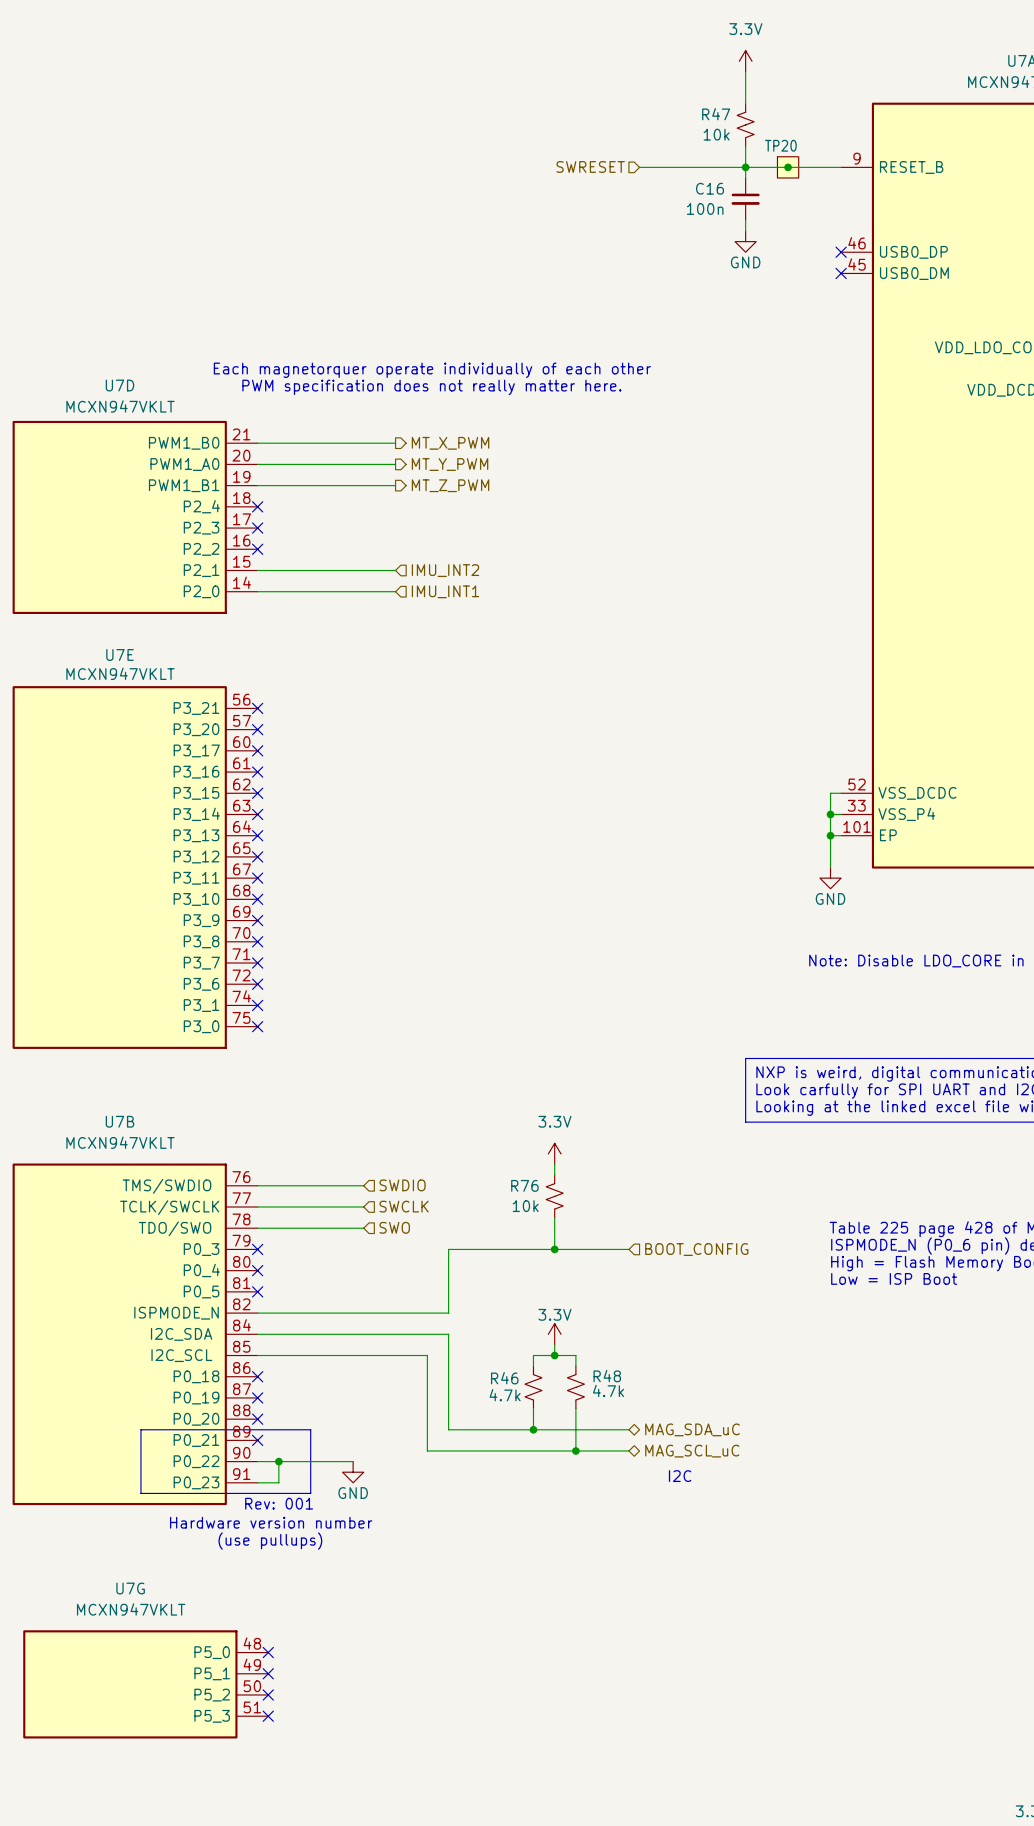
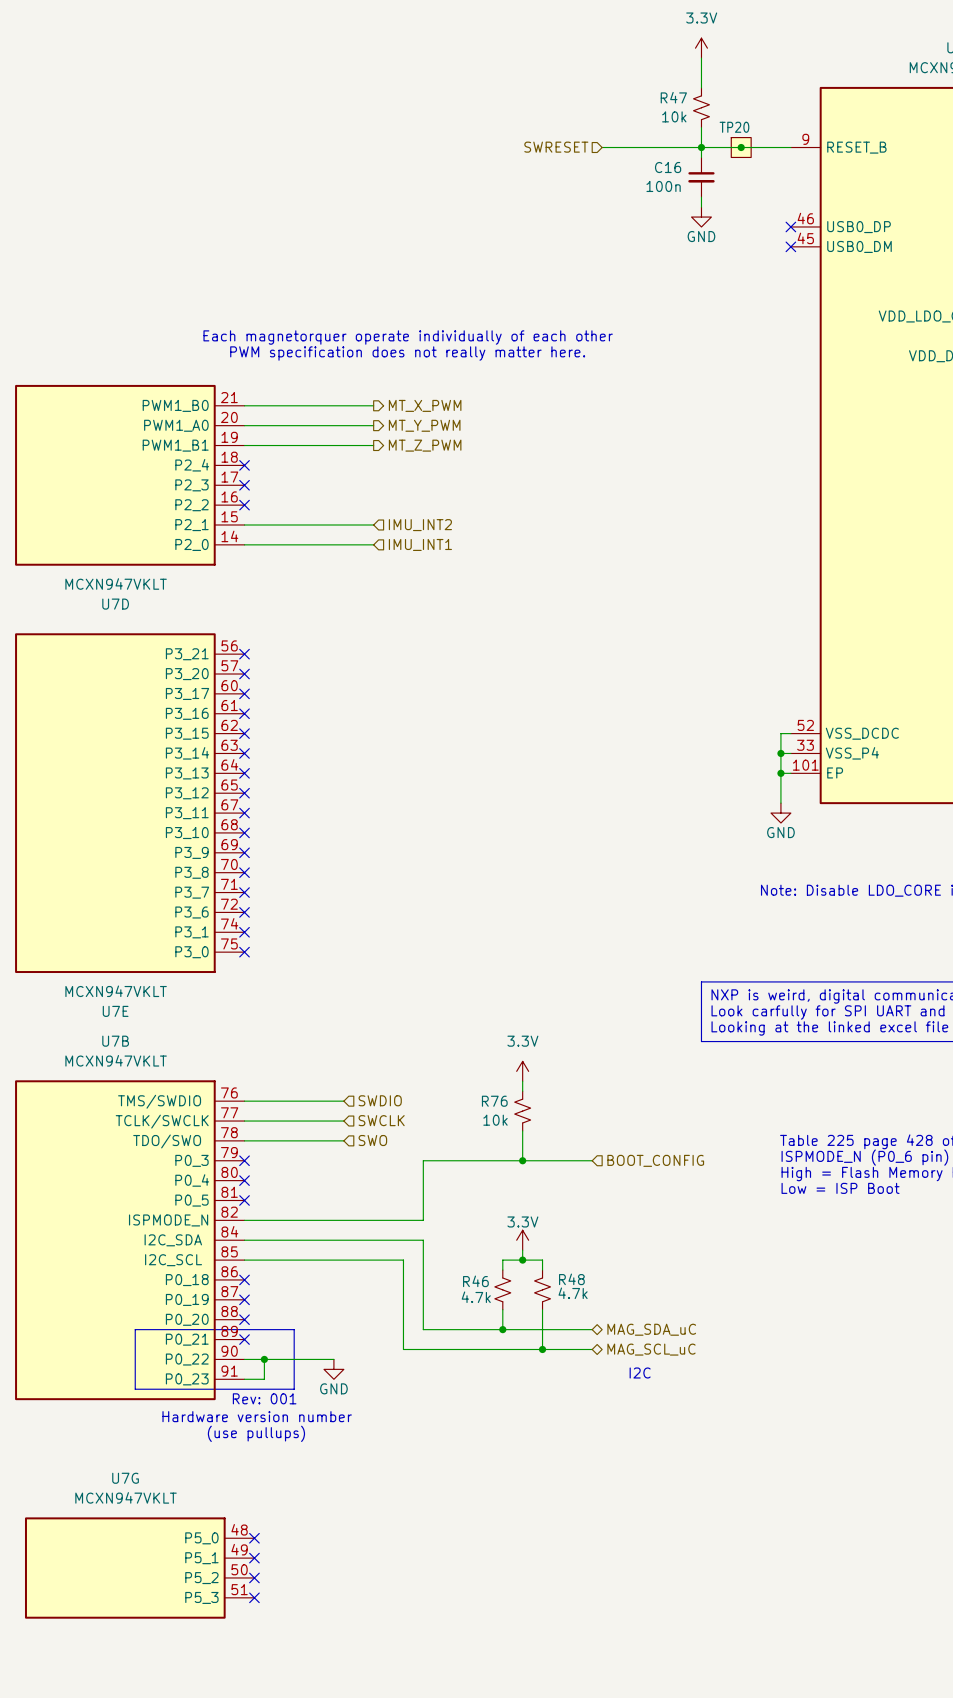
U7D name position: U7D (119, 385) -> U7D (115, 604)
U7D value position: MCXN947VKLT (120, 406) -> MCXN947VKLT (116, 583)
U7E name position: U7E (119, 654) -> U7E (115, 1011)
U7E value position: MCXN947VKLT (120, 673) -> MCXN947VKLT (116, 991)

